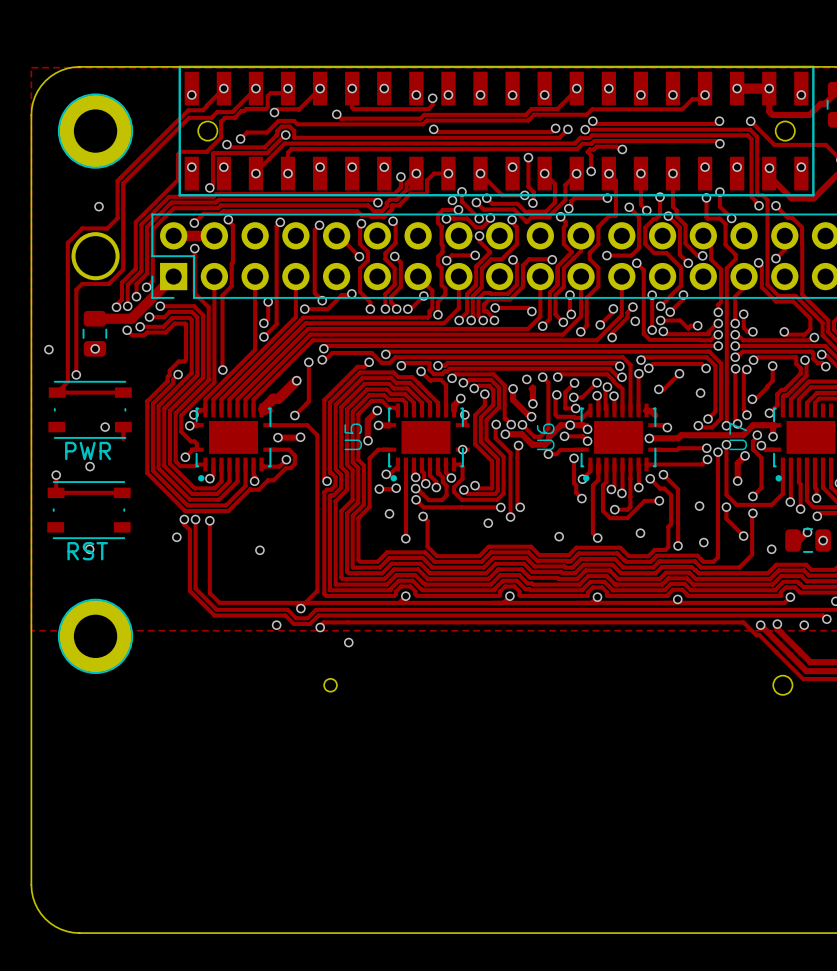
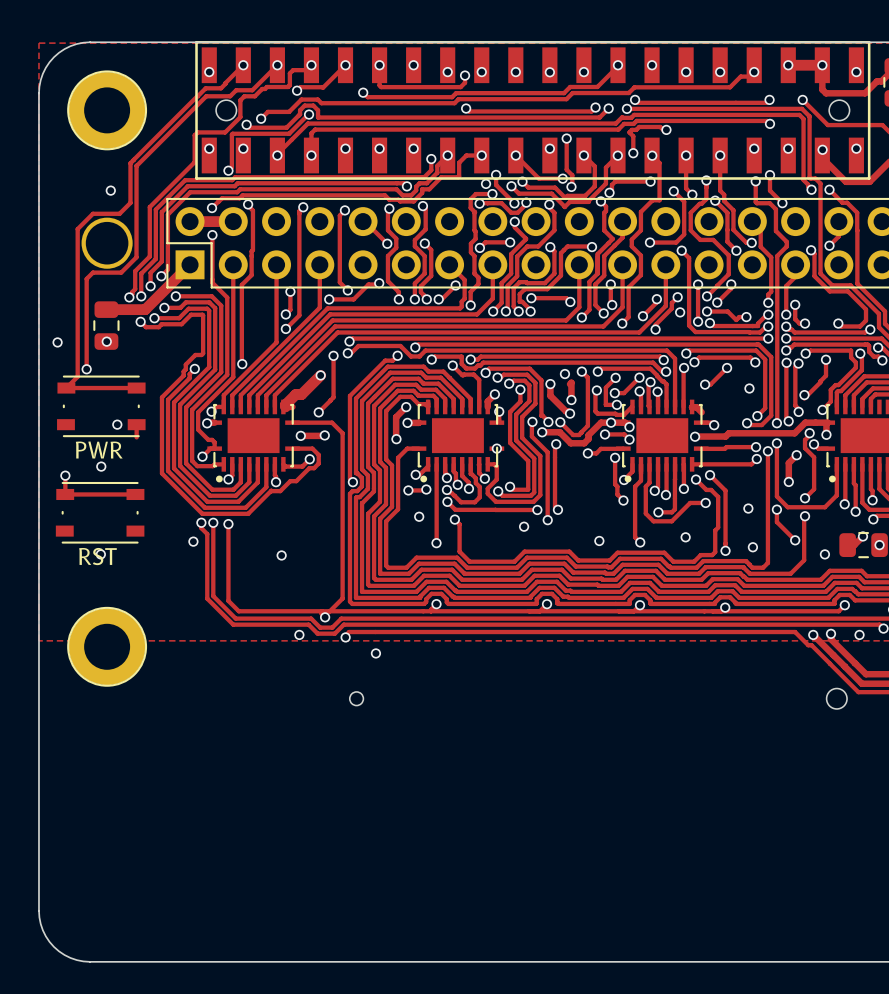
U5 name: U5 (353, 436) -> none
U6 name: U6 (545, 436) -> none
U7 name: U7 (738, 436) -> none

